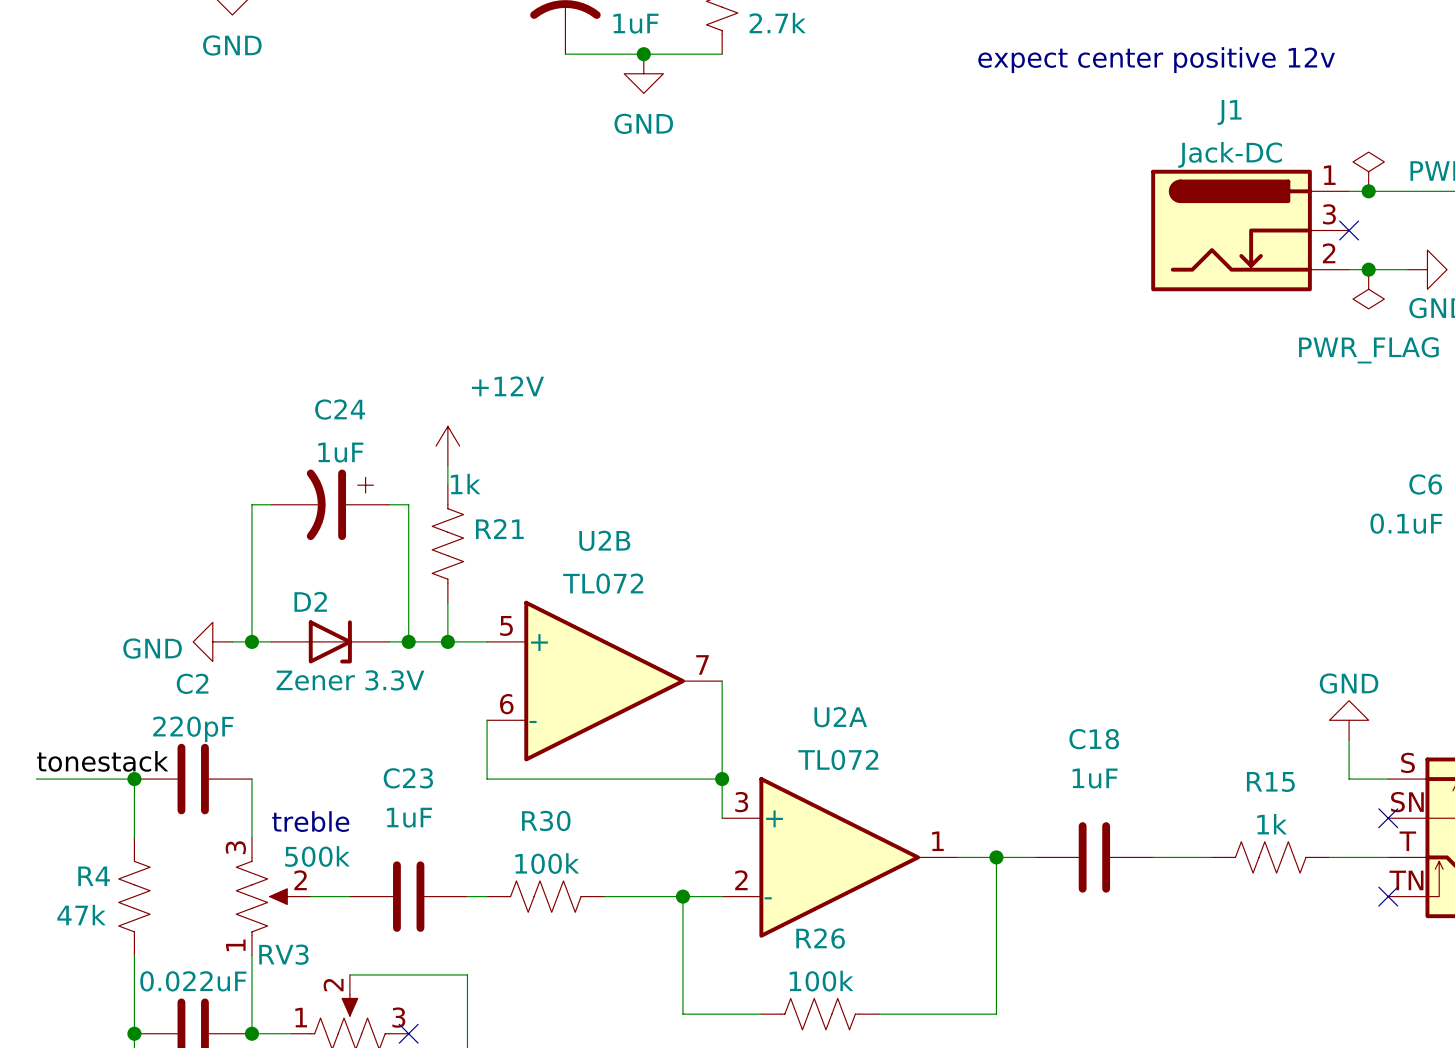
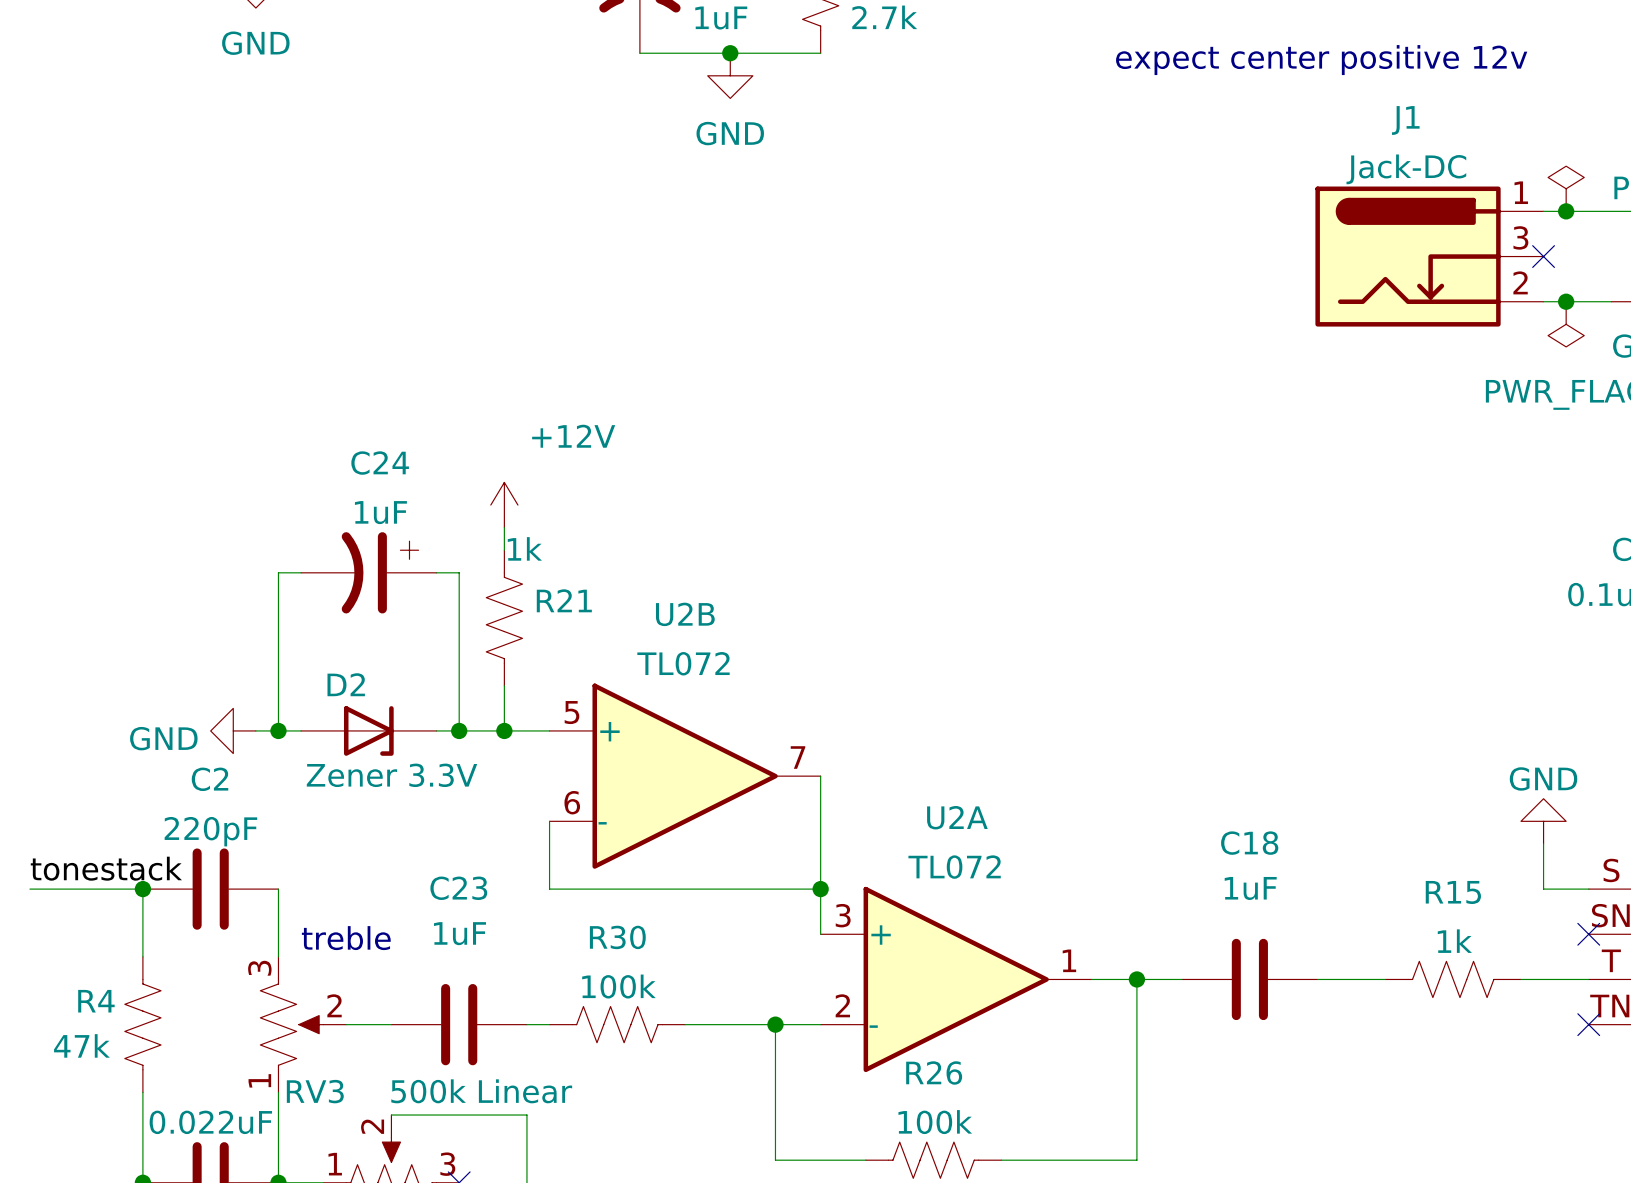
RV3 value: 500k (317, 856) -> 500k Linear (481, 1091)

